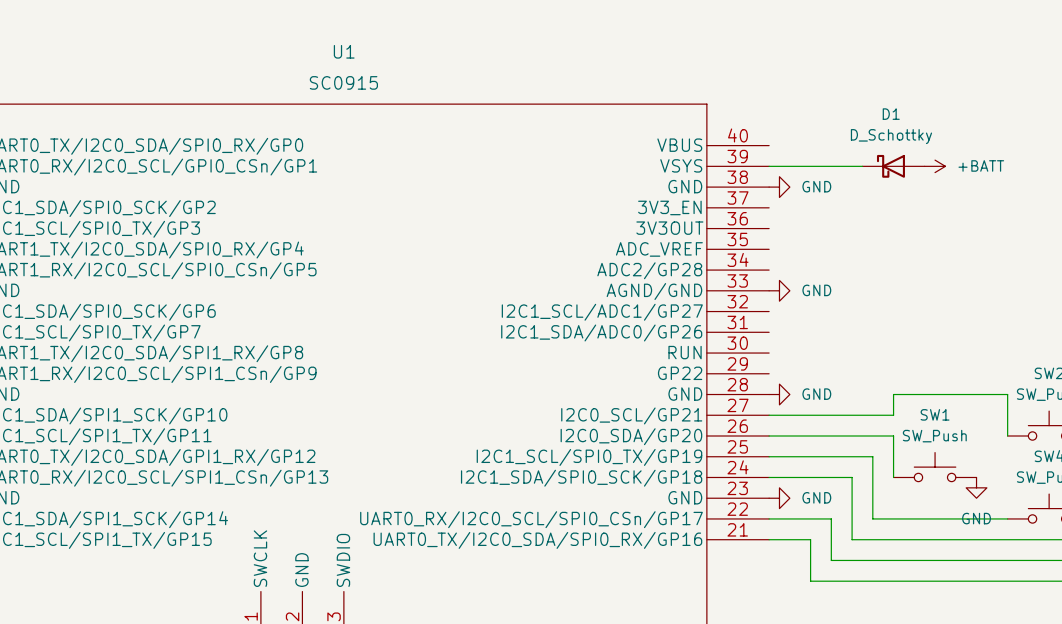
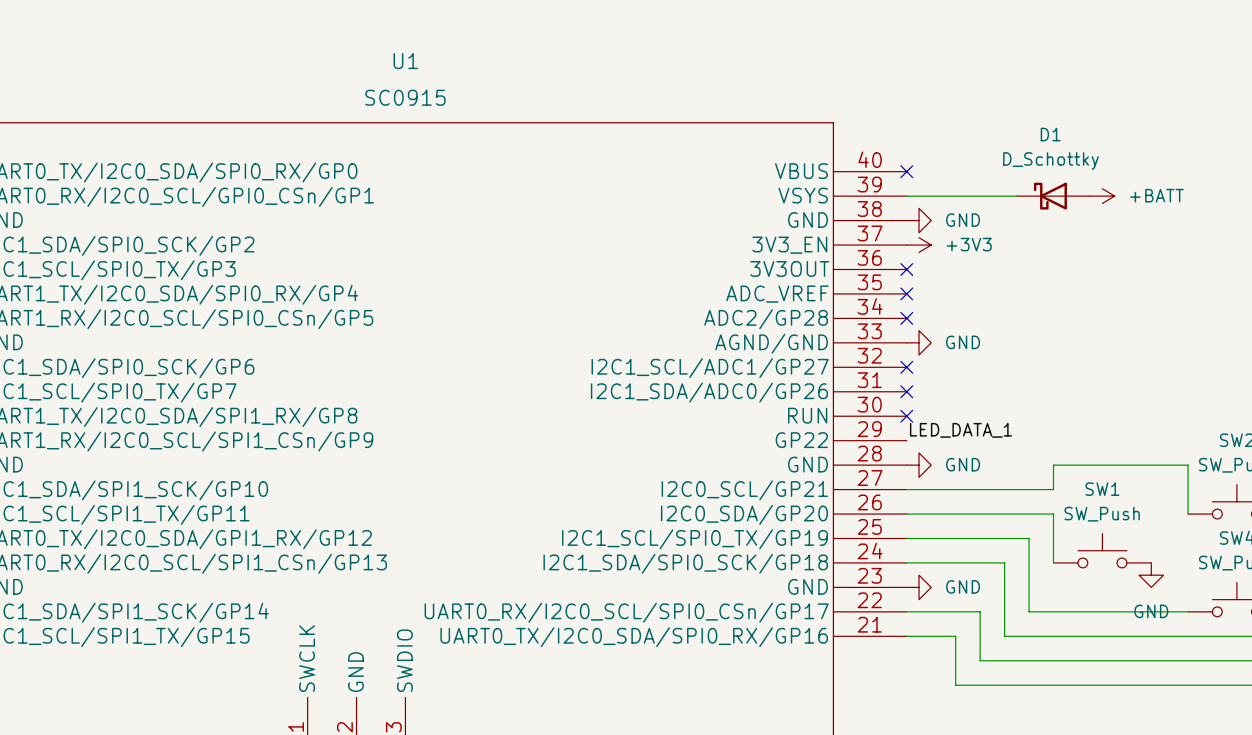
no-connect mark: none -> (906, 171)
power symbol: none -> +3V3 (919, 245)
no-connect mark: none -> (906, 269)
no-connect mark: none -> (906, 293)
no-connect mark: none -> (906, 318)
no-connect mark: none -> (906, 367)
no-connect mark: none -> (906, 391)
no-connect mark: none -> (906, 416)
label: none -> LED_DATA_1 (961, 430)

